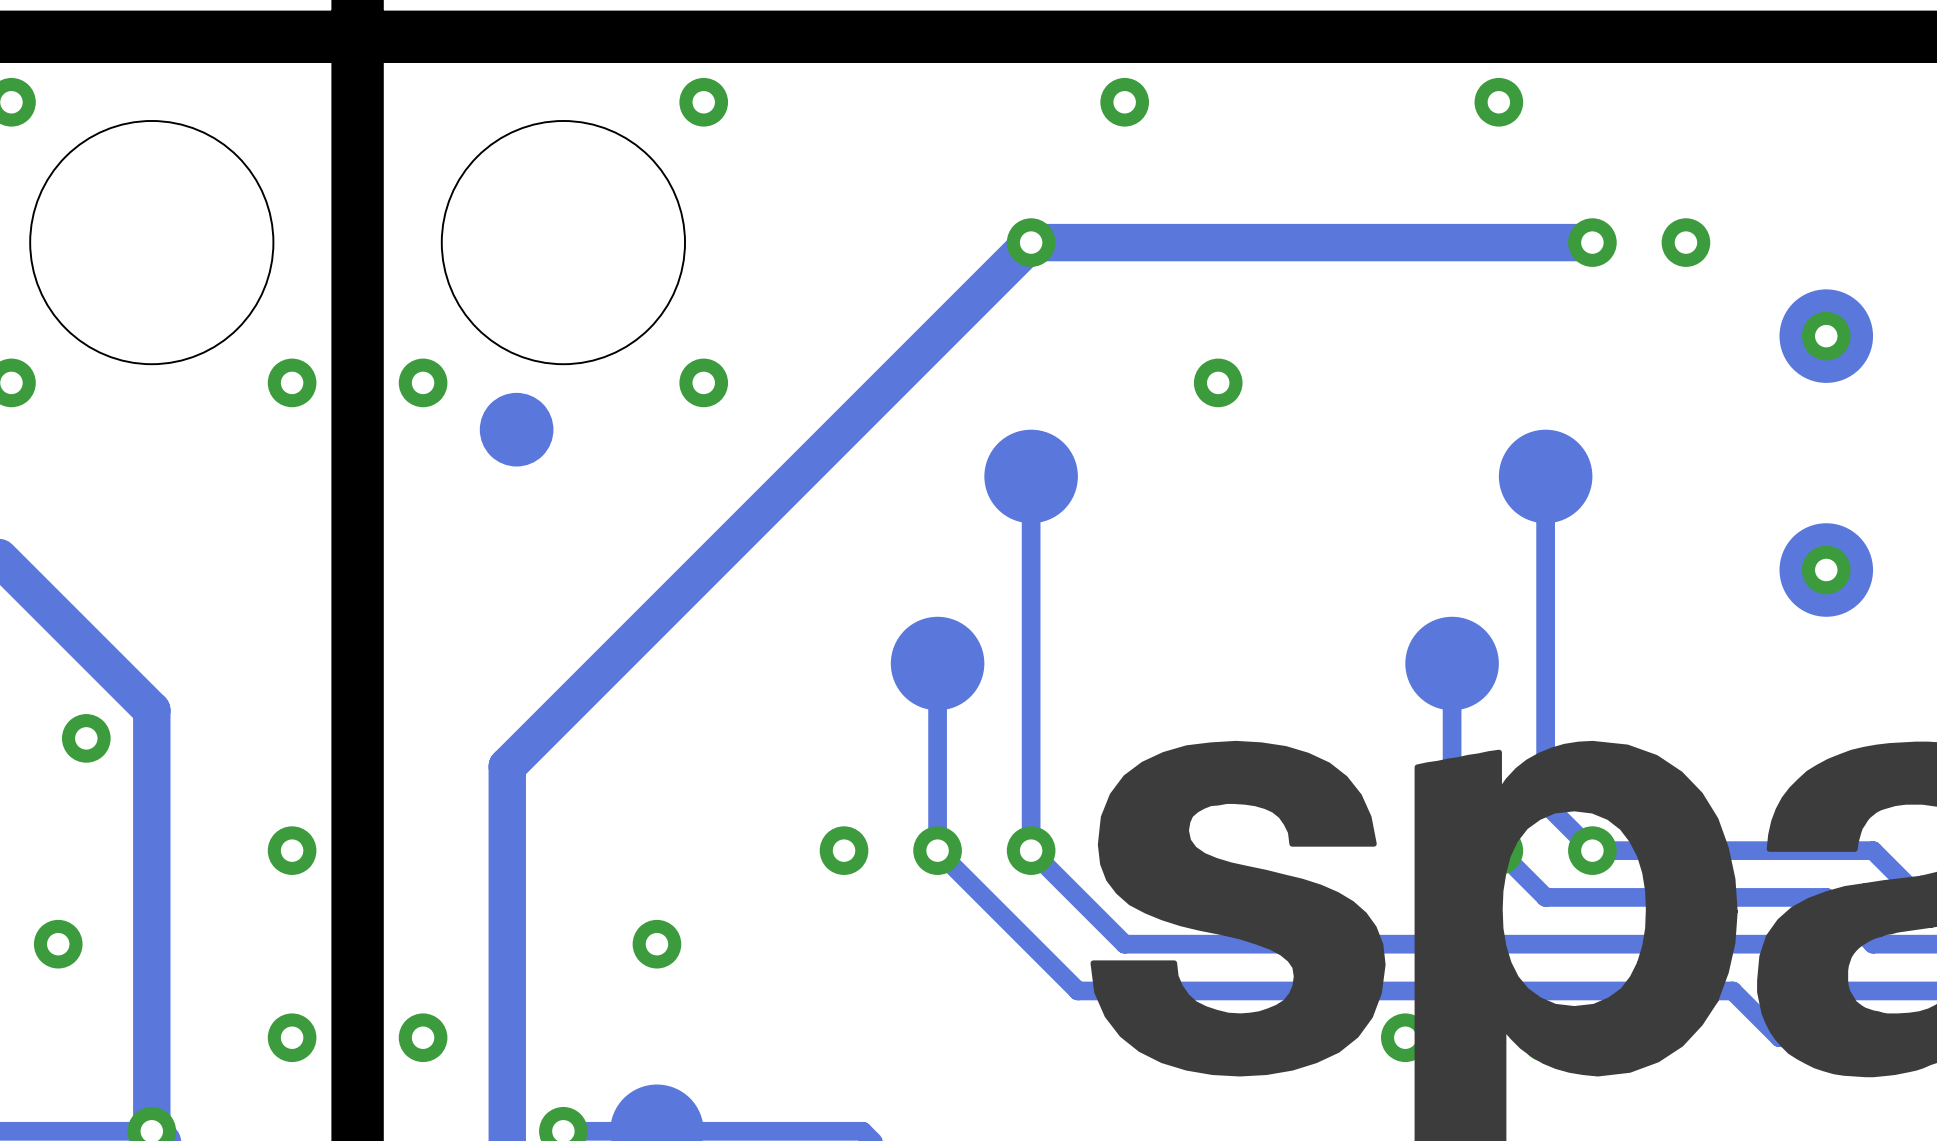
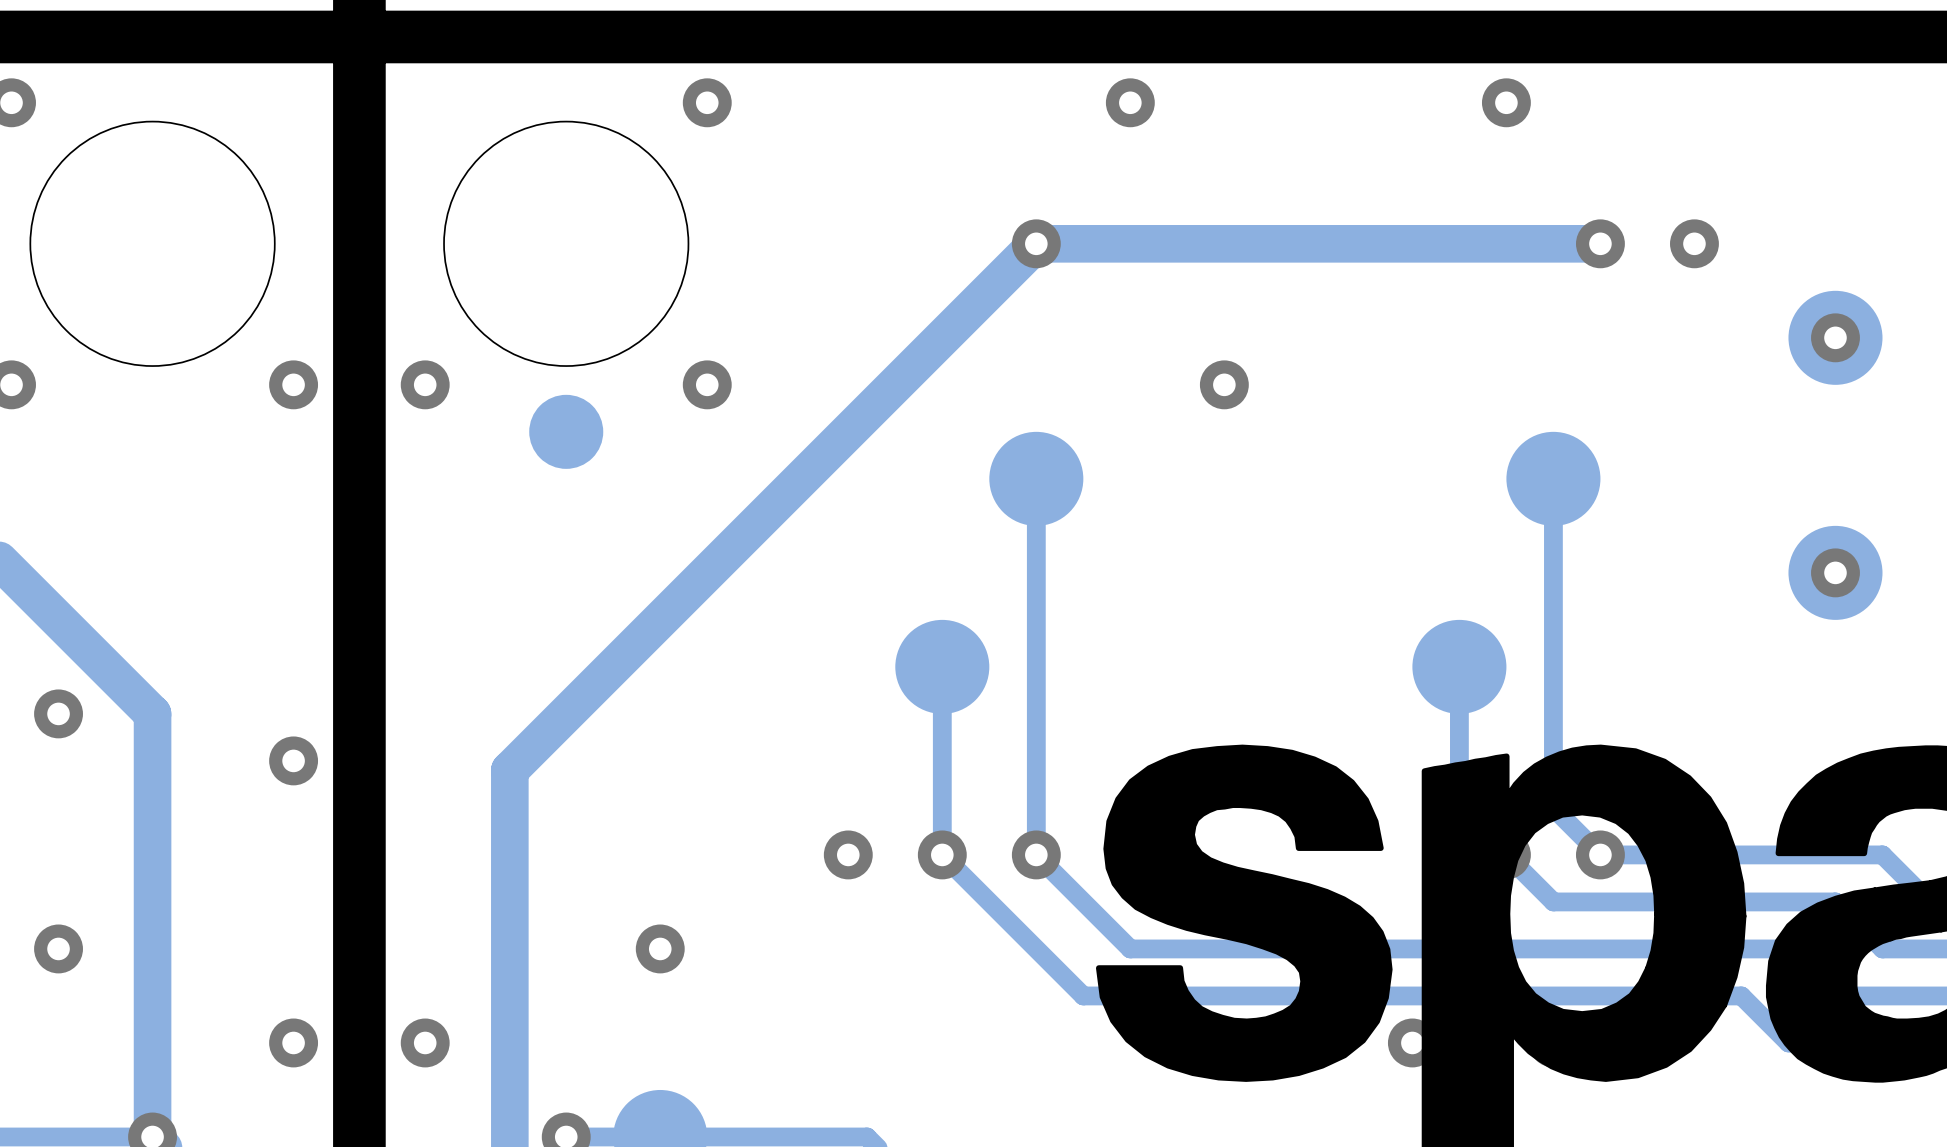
part position: (516, 429) -> (566, 431)
via position: (86, 738) -> (58, 713)
via position: (292, 850) -> (293, 760)

